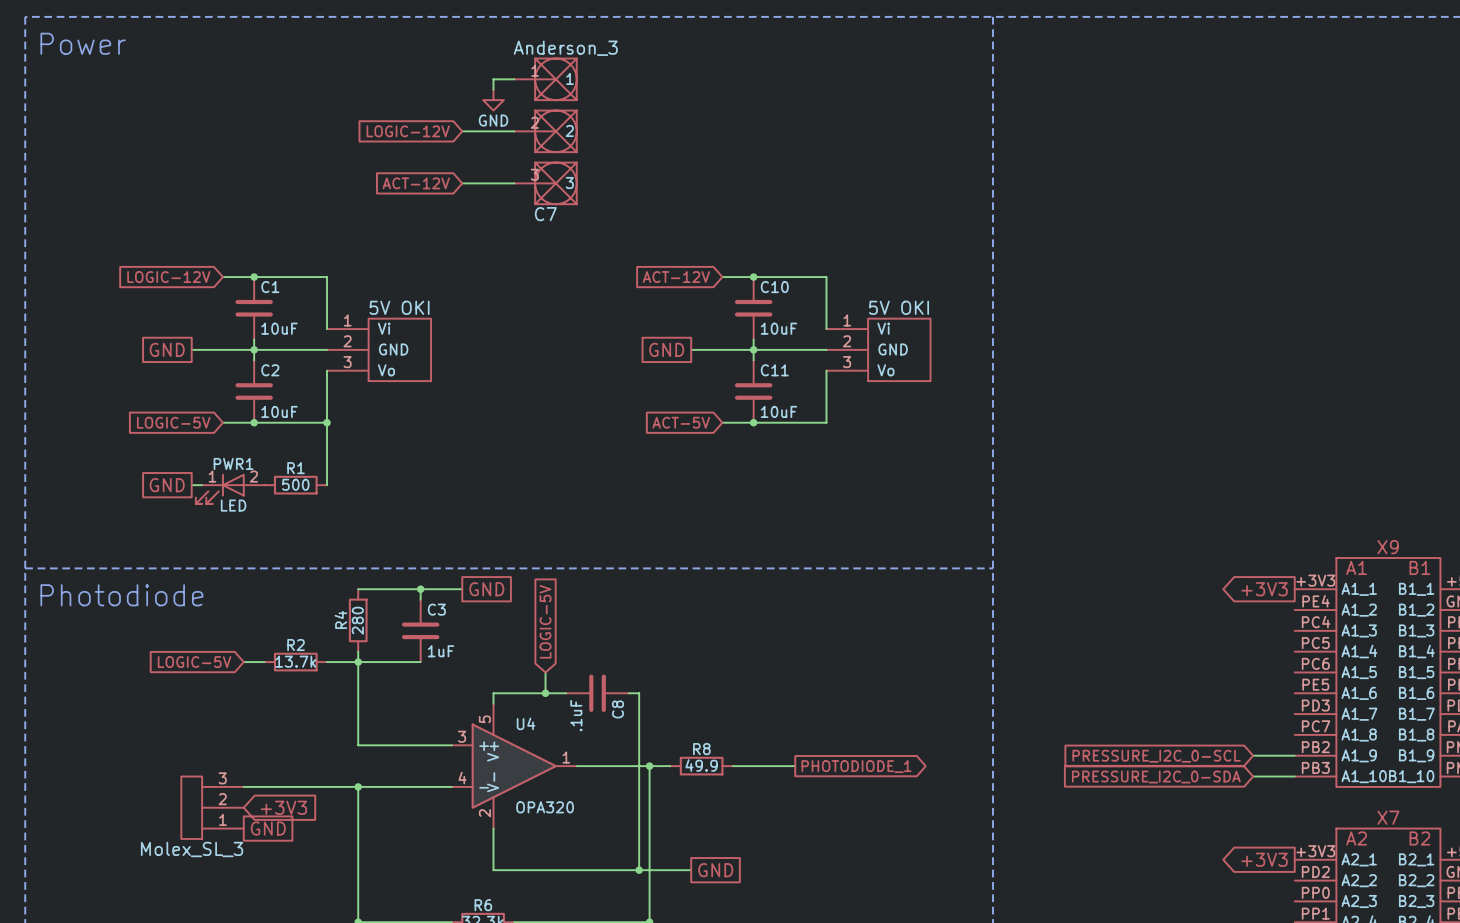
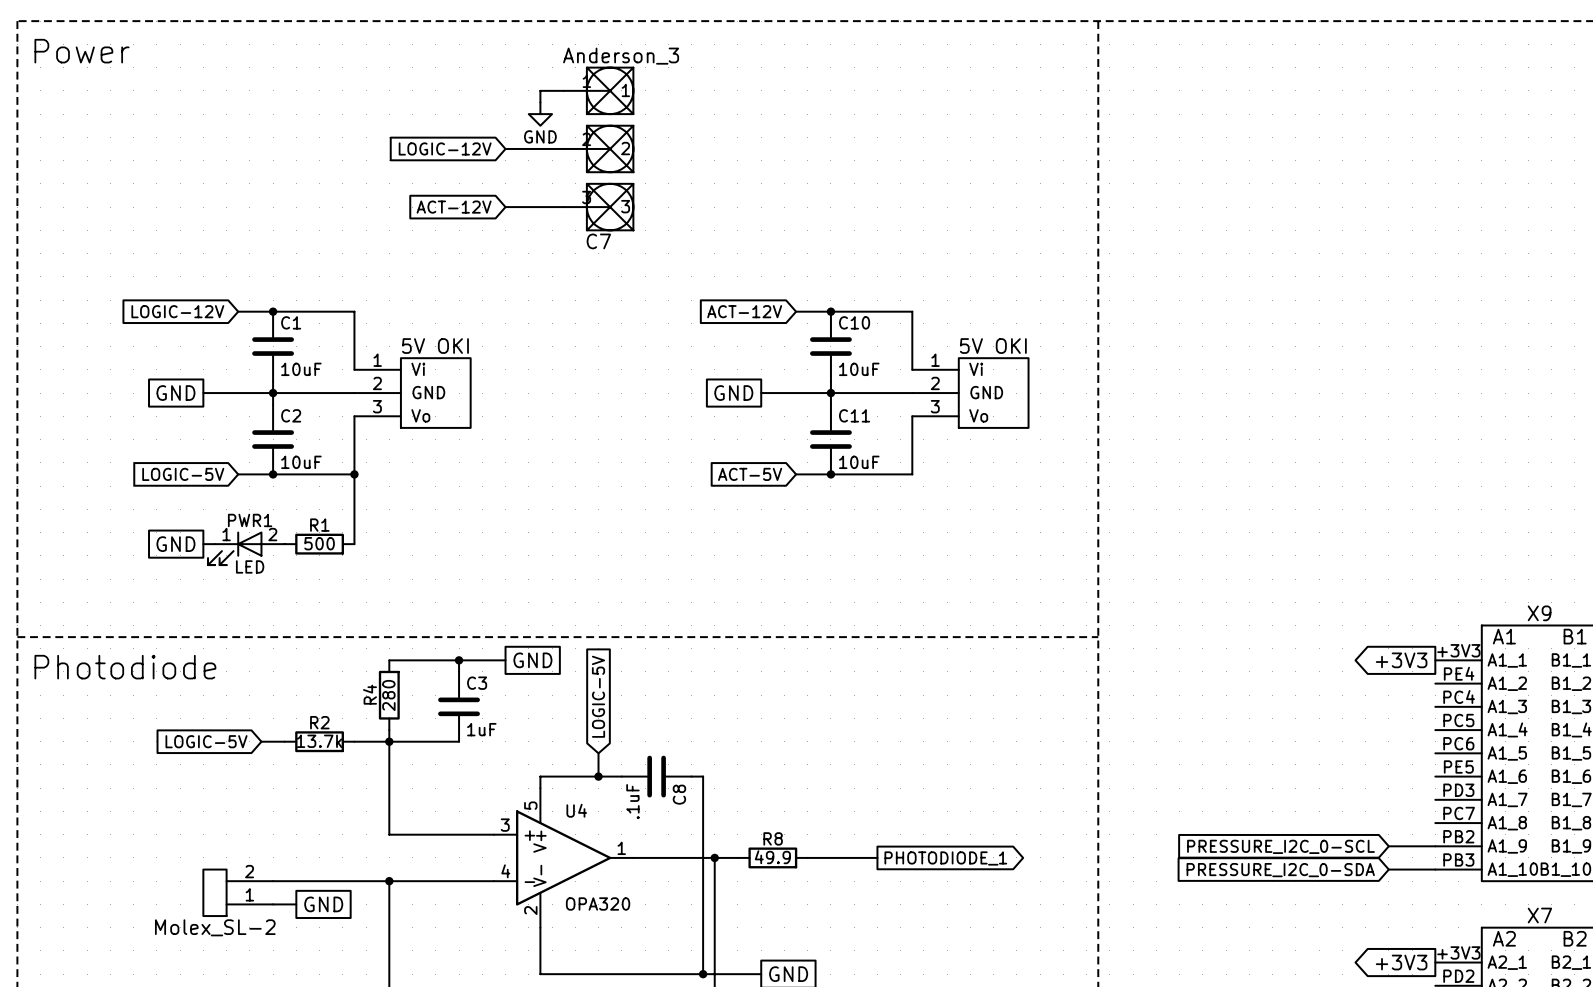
part: none -> Molex_SL-2 (238, 892)
part: Molex_SL_3 (212, 807) -> none
wire: none -> (273, 904) (296, 904)
global label: +3V3 (283, 807) -> none
global label position: GND (268, 828) -> GND (323, 904)

